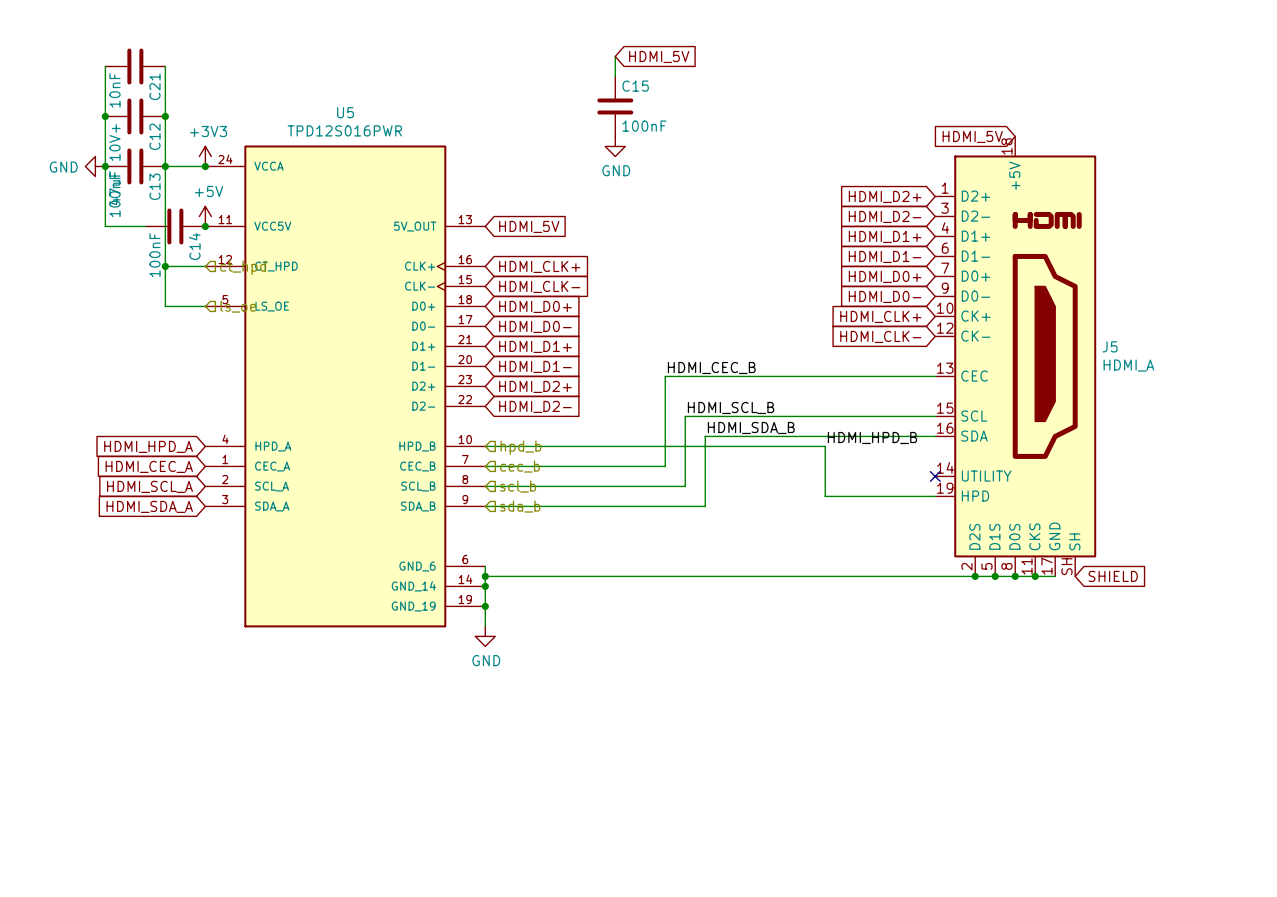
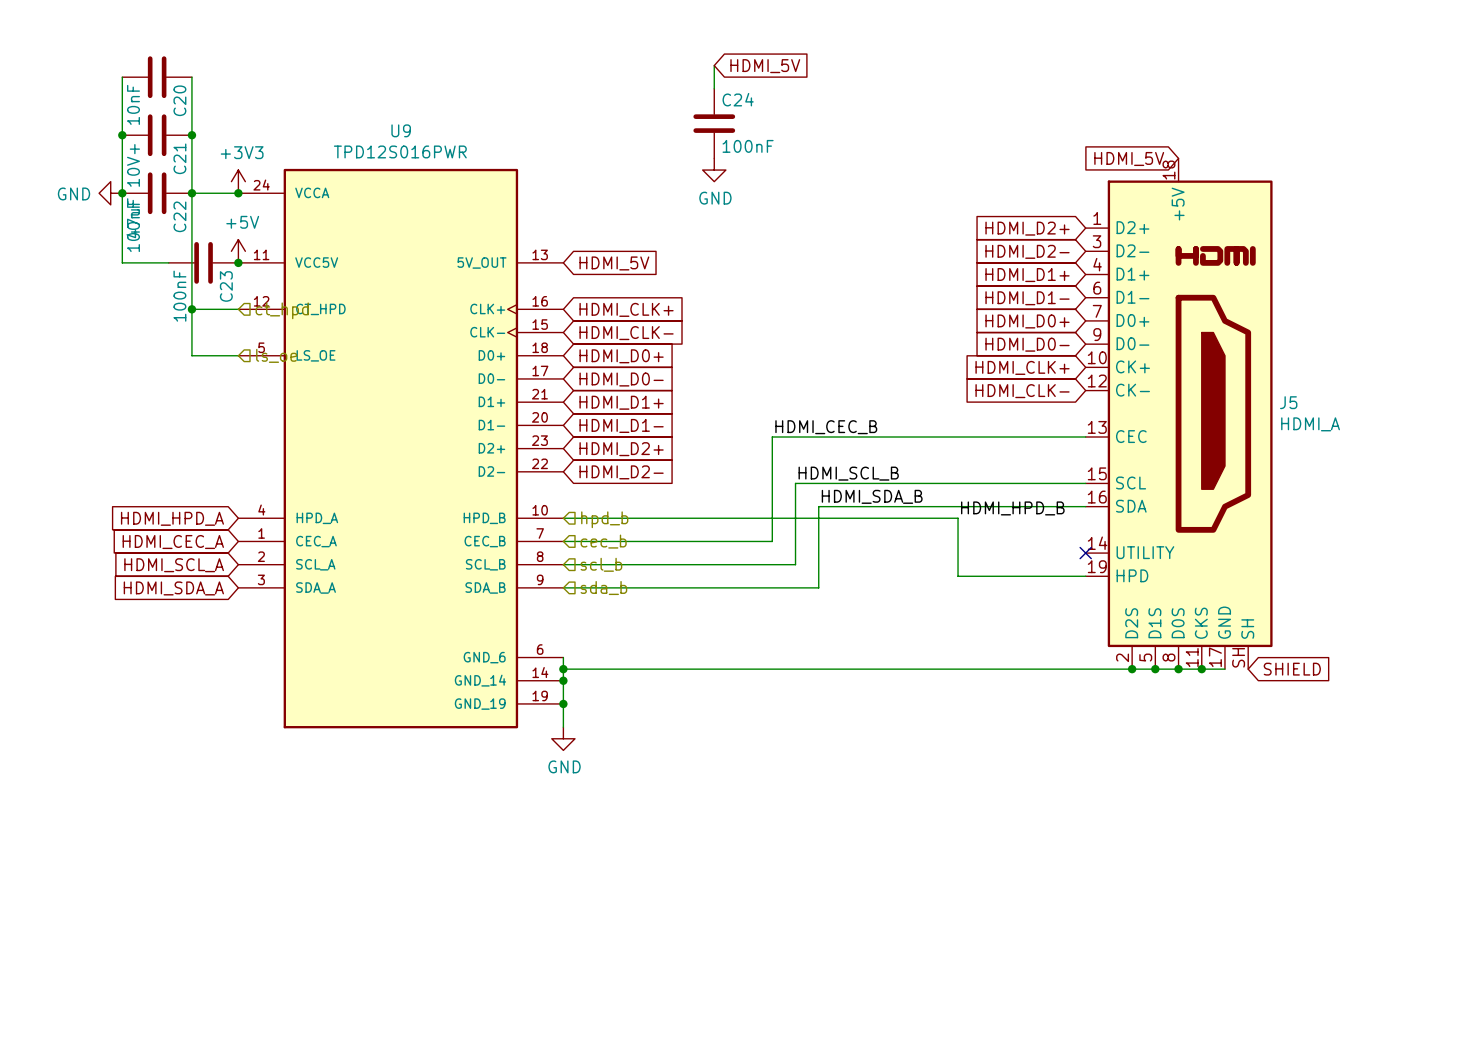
C21 name: C21 (154, 86) -> C20 (179, 100)
C15 name: C15 (635, 86) -> C24 (738, 99)
U5 name: U5 (345, 112) -> U9 (401, 130)
C12 name: C12 (154, 136) -> C21 (179, 158)
C13 name: C13 (154, 186) -> C22 (179, 216)
C14 name: C14 (194, 246) -> C23 (226, 286)

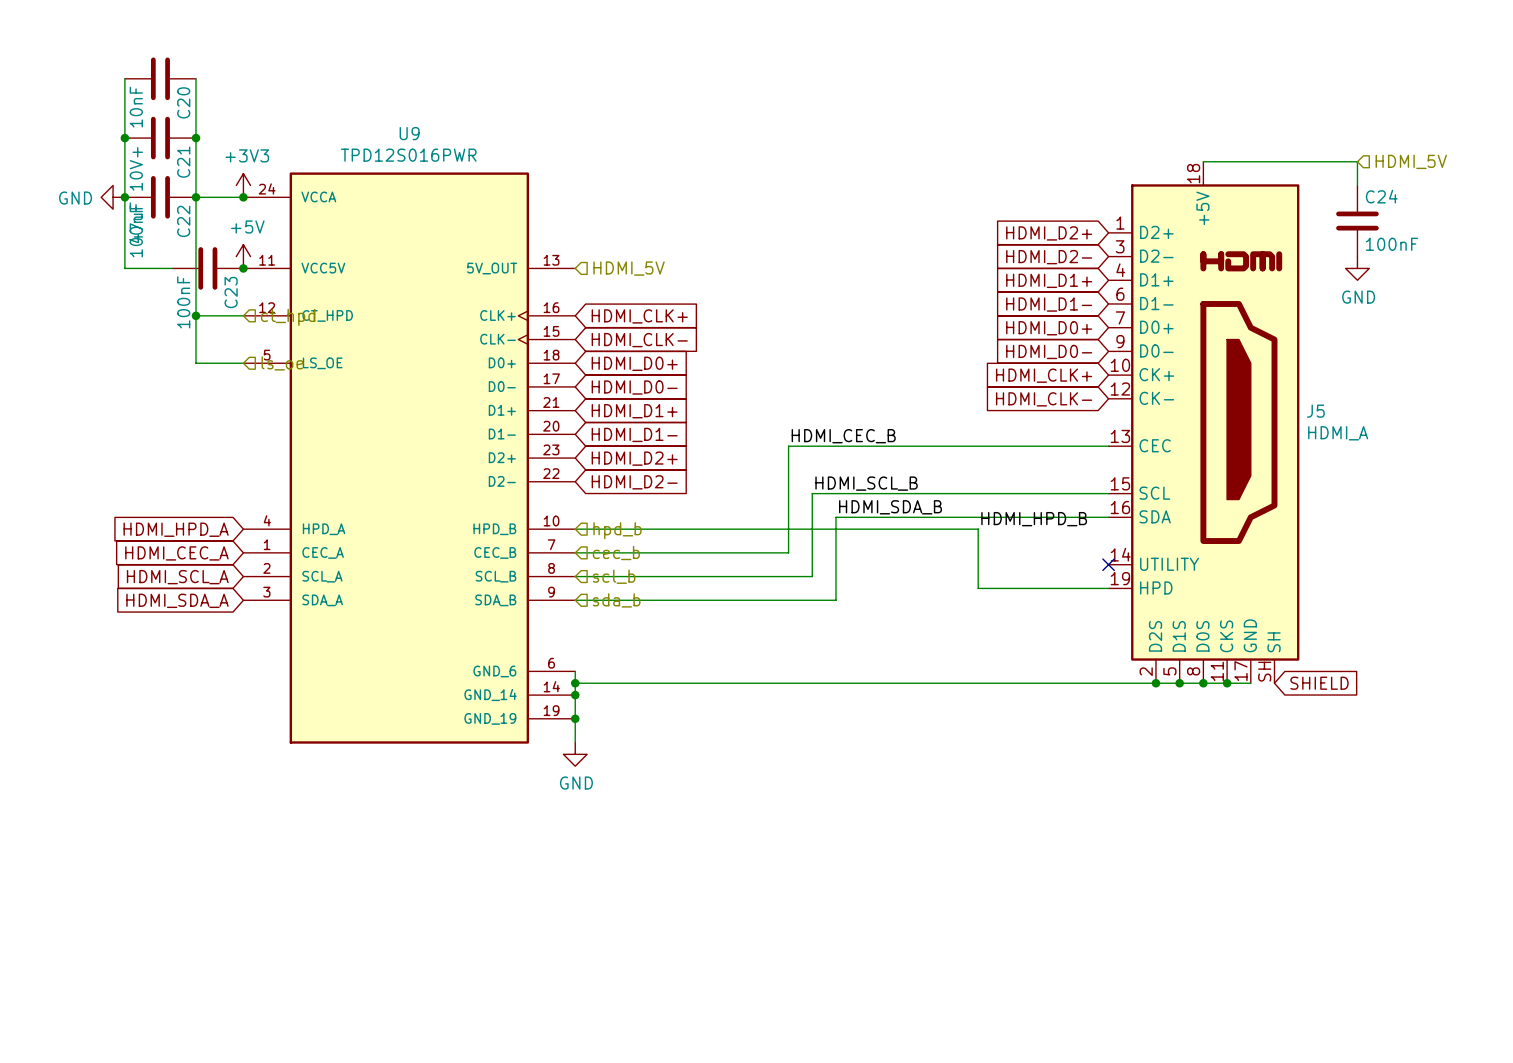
wire: (714, 65) (714, 88) -> none
global label: HDMI_5V (765, 66) -> none
C24 position: (714, 123) -> (1357, 221)
global label: HDMI_5V (1129, 158) -> none
wire: none -> (1203, 161) (1357, 161) (1357, 185)
hierarchical label: none -> HDMI_5V (1411, 161)
power symbol: GND (714, 170) -> none
power symbol: none -> GND (1357, 268)
global label: HDMI_5V (614, 263) -> none
hierarchical label: none -> HDMI_5V (629, 268)

